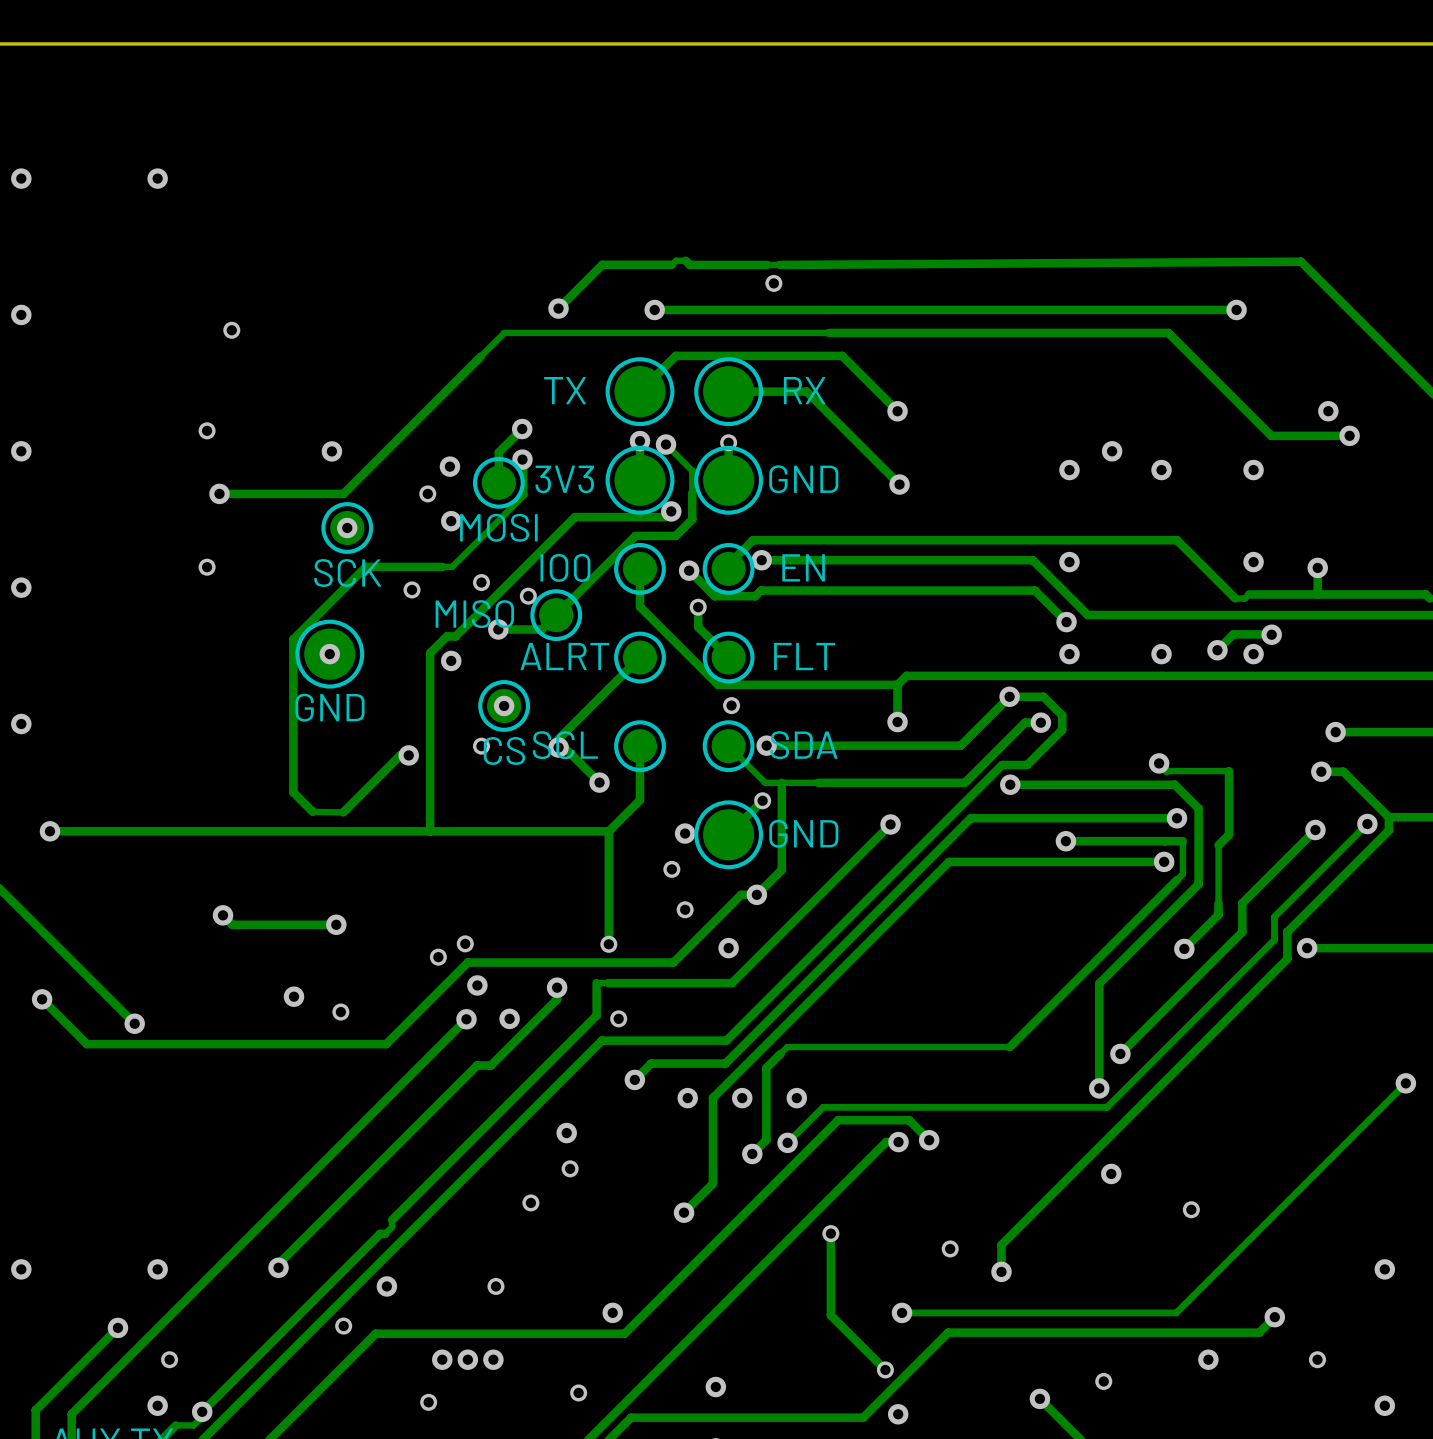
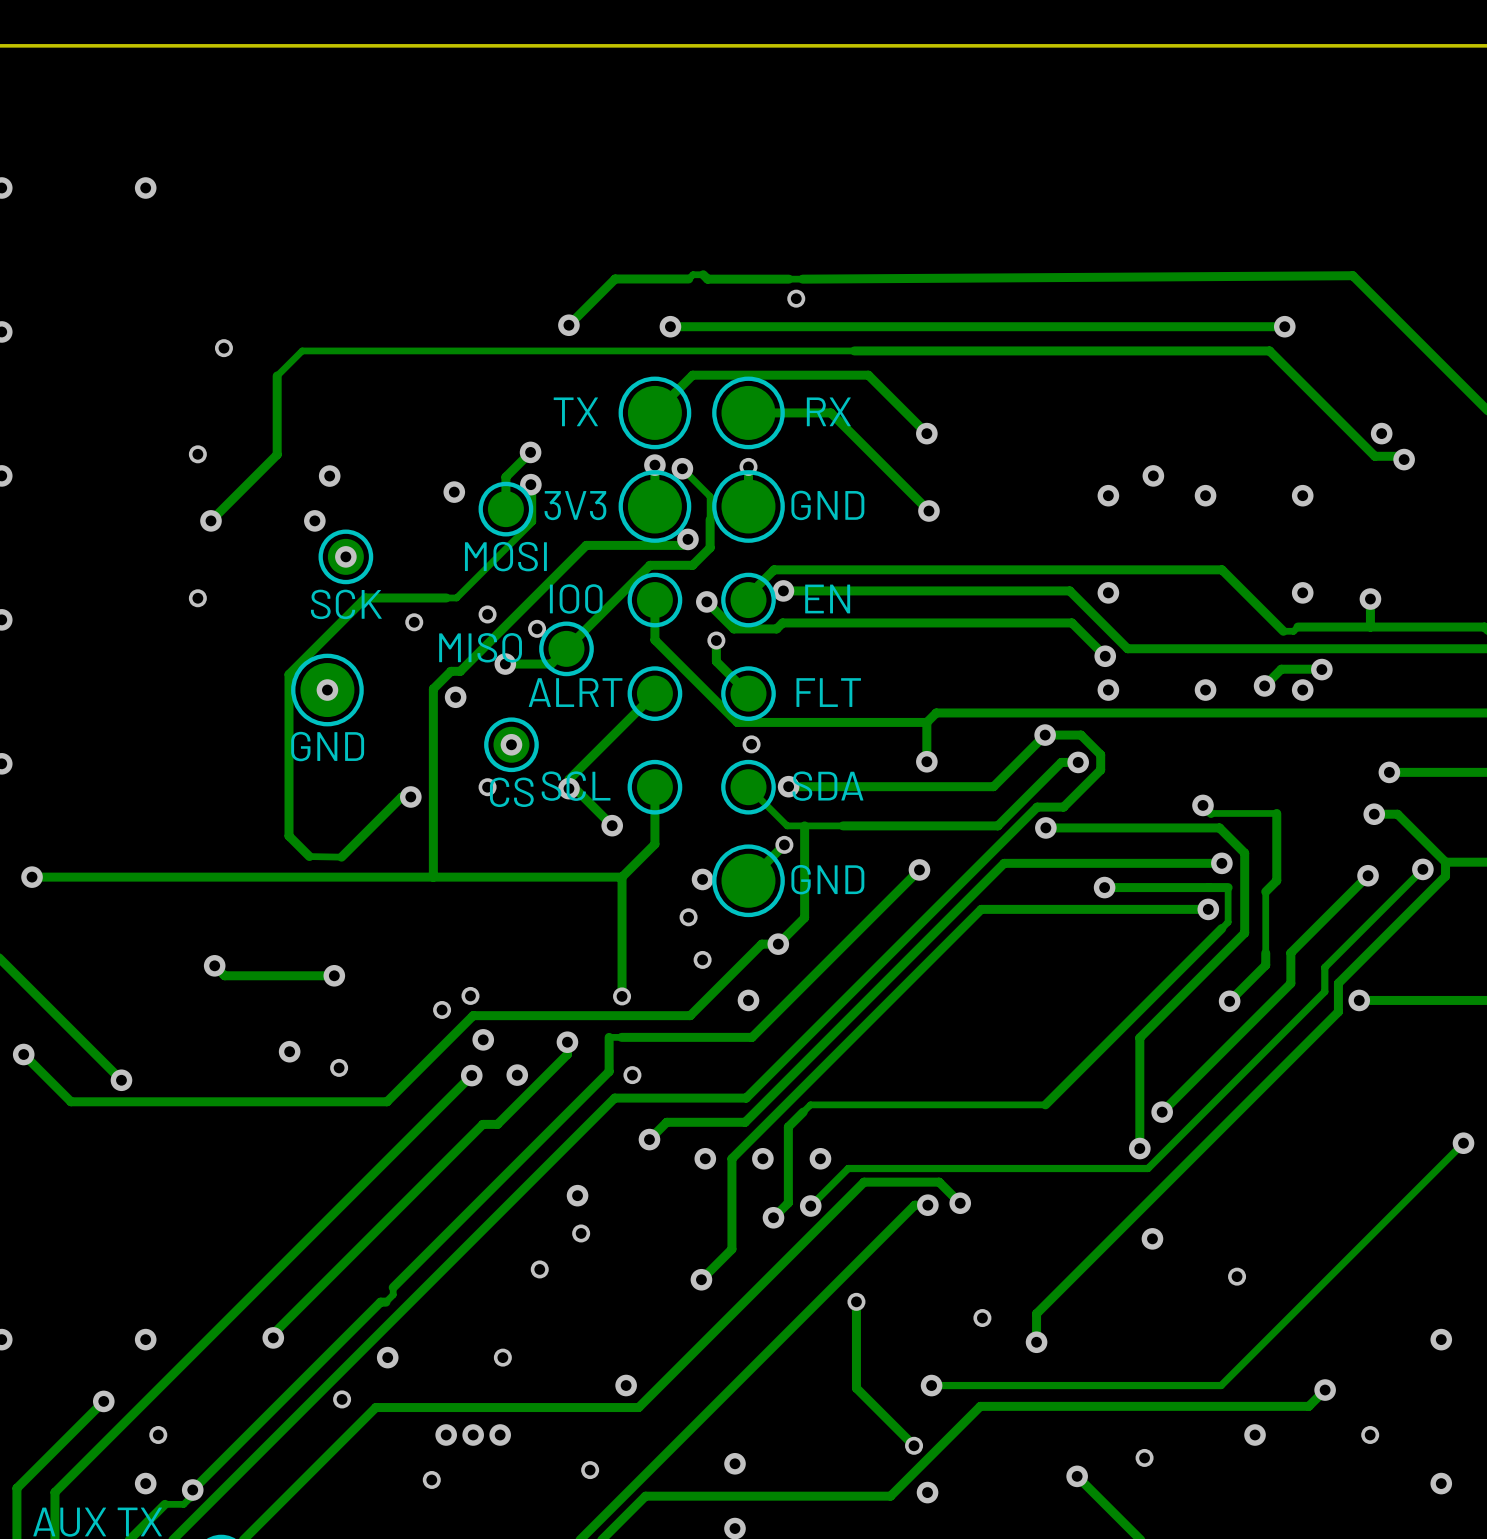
track: (504, 332) (343, 493) (219, 493) -> (511, 350) (302, 350) (277, 375) (277, 454) (210, 520)
track: (1168, 332) (1271, 435) (1349, 435) -> (1212, 350) (1269, 350) (1374, 456) (1401, 456)
via: (427, 493) -> none
via position: (451, 521) -> (314, 520)

